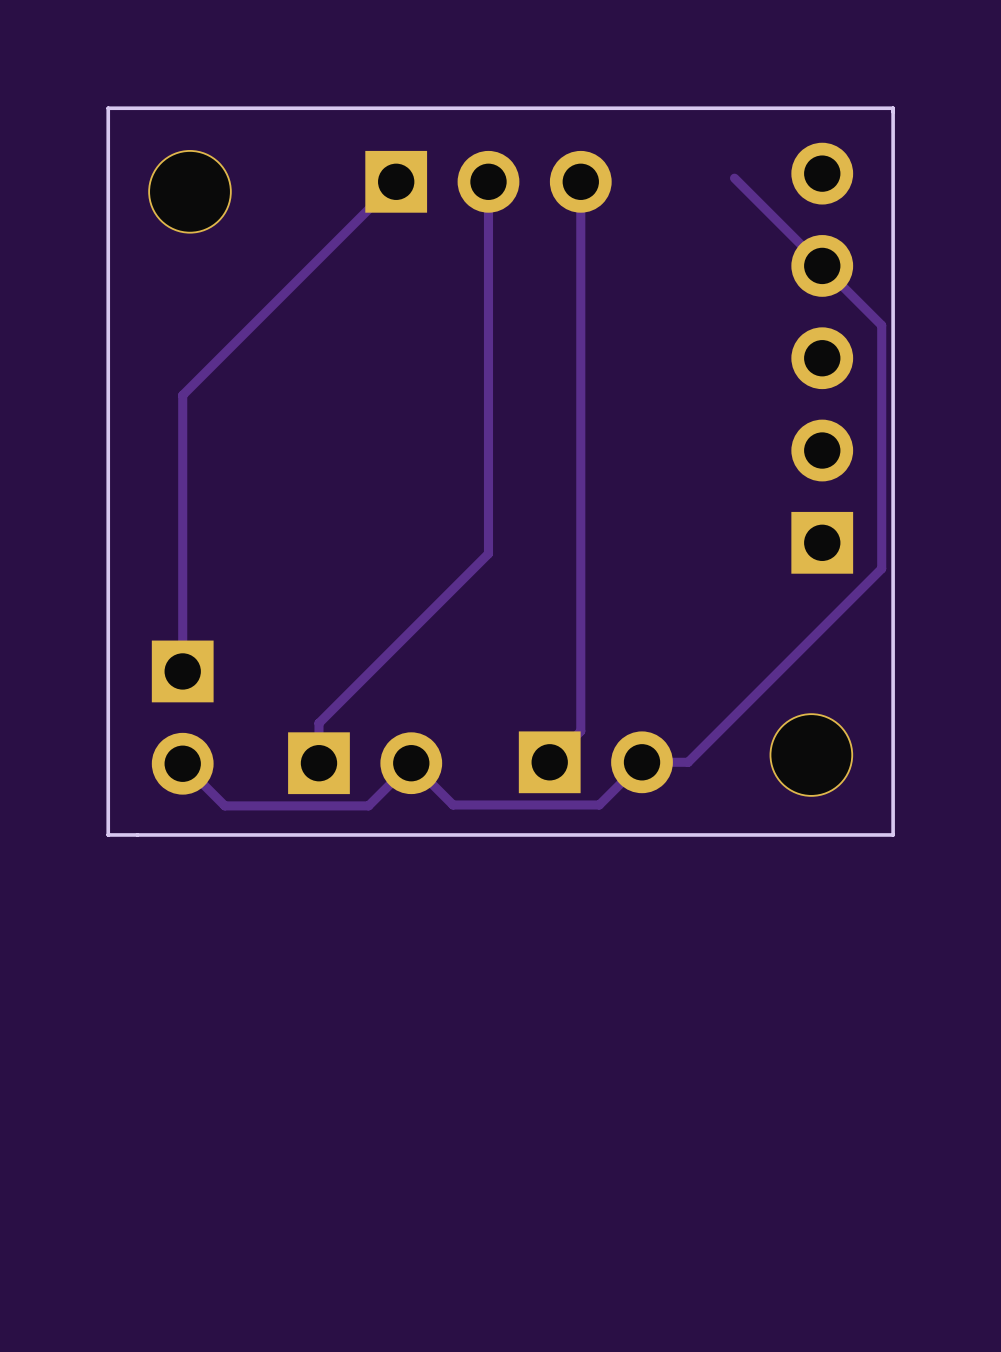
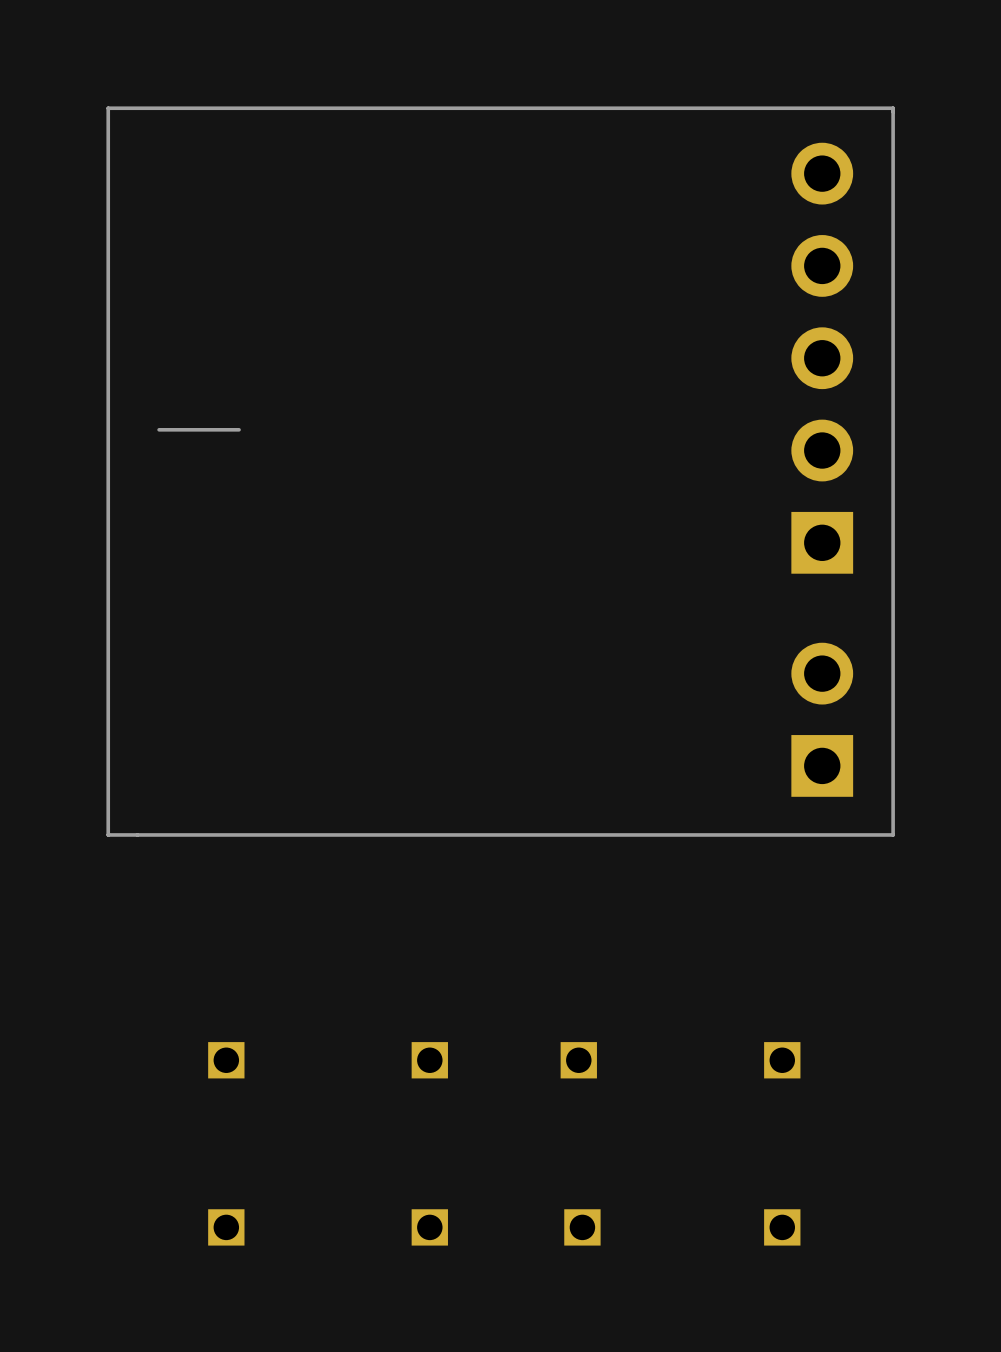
track: (734, 178) (881, 325) (881, 568) (688, 762) (642, 762) (599, 804) (453, 804) (411, 763) (368, 805) (224, 805) (182, 763) -> none
track: (396, 181) (182, 395) (182, 671) -> none
track: (488, 181) (488, 553) (318, 723) (318, 763) -> none
part: (488, 181) -> none
track: (580, 181) (580, 731) (549, 762) -> none
part: (189, 191) -> none
board edge: none -> (239, 429) (159, 429)
part: (182, 717) -> none
part: none -> (822, 719)
part: (811, 755) -> none
part: (595, 762) -> none
part: (365, 763) -> none
part: none -> (226, 1060)
part: none -> (429, 1060)
part: none -> (578, 1060)
part: none -> (782, 1060)
part: none -> (226, 1227)
part: none -> (429, 1227)
part: none -> (582, 1227)
part: none -> (782, 1227)

